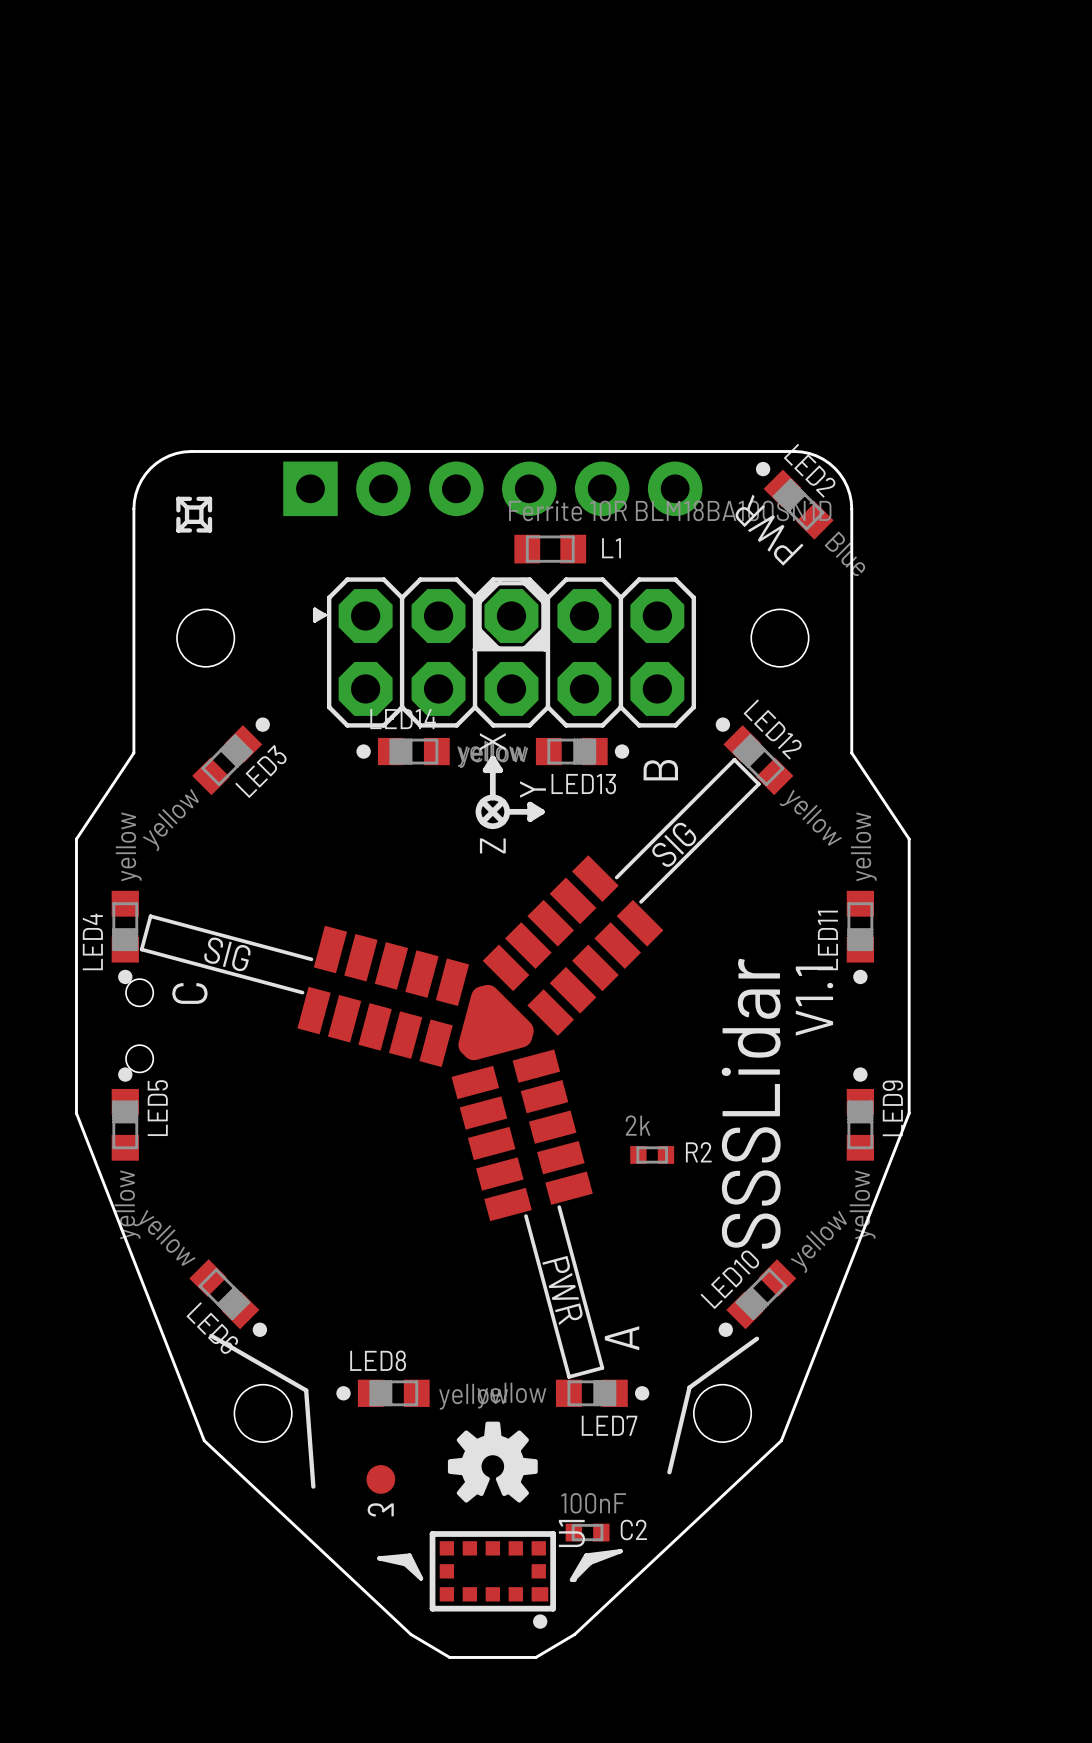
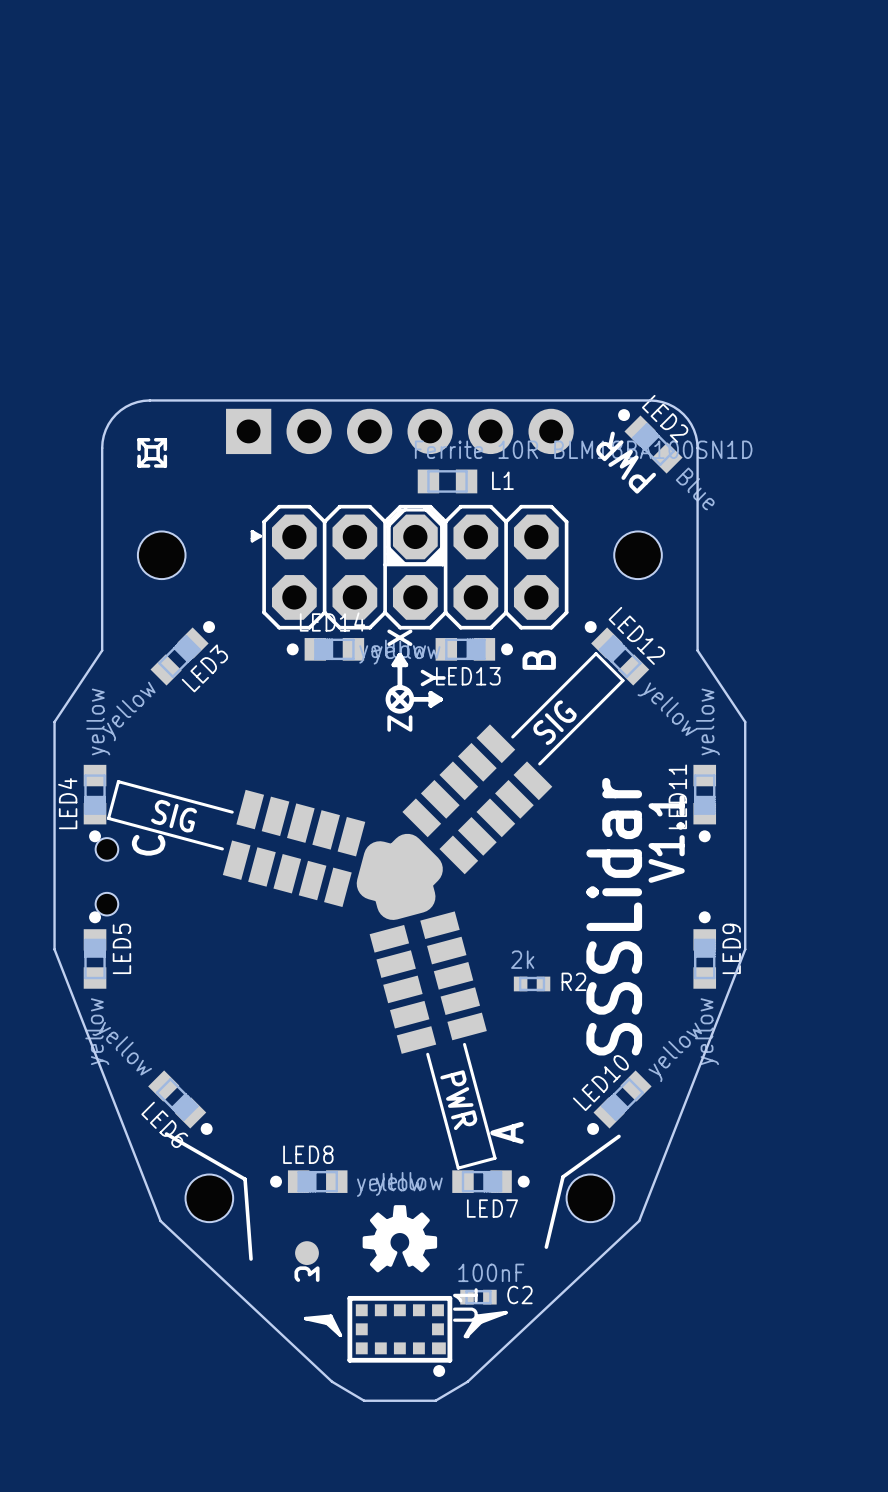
part footprint: [472, 757, 761, 1047] -> [385, 652, 625, 892]
part footprint: [139, 914, 500, 1068] -> [107, 780, 404, 908]
part footprint: [451, 1019, 605, 1379] -> [369, 872, 497, 1170]

